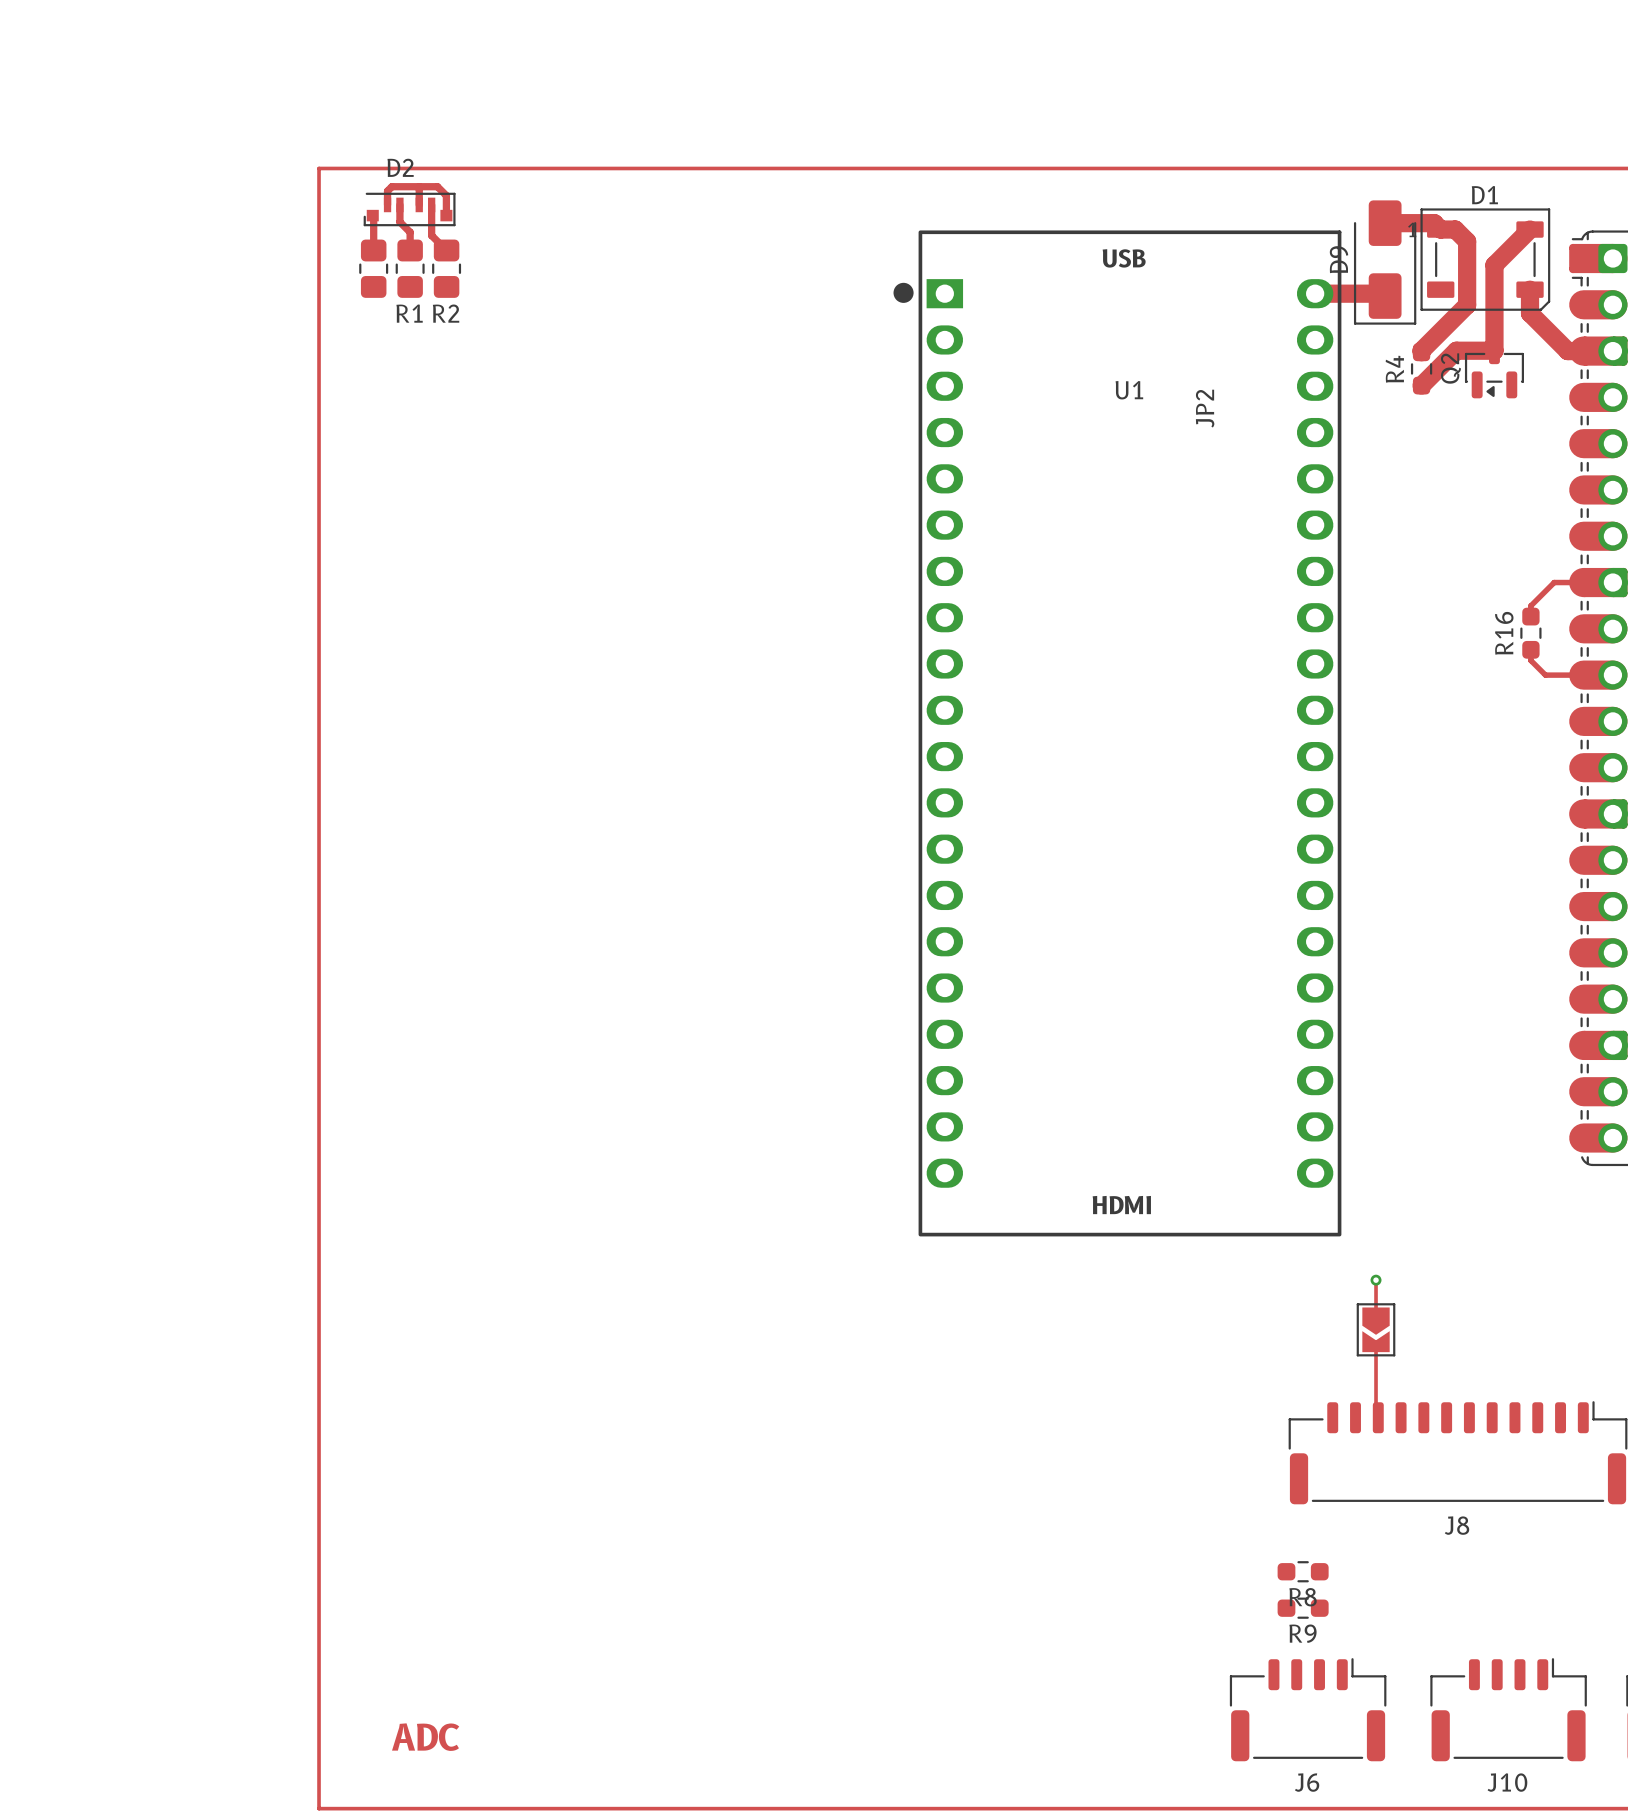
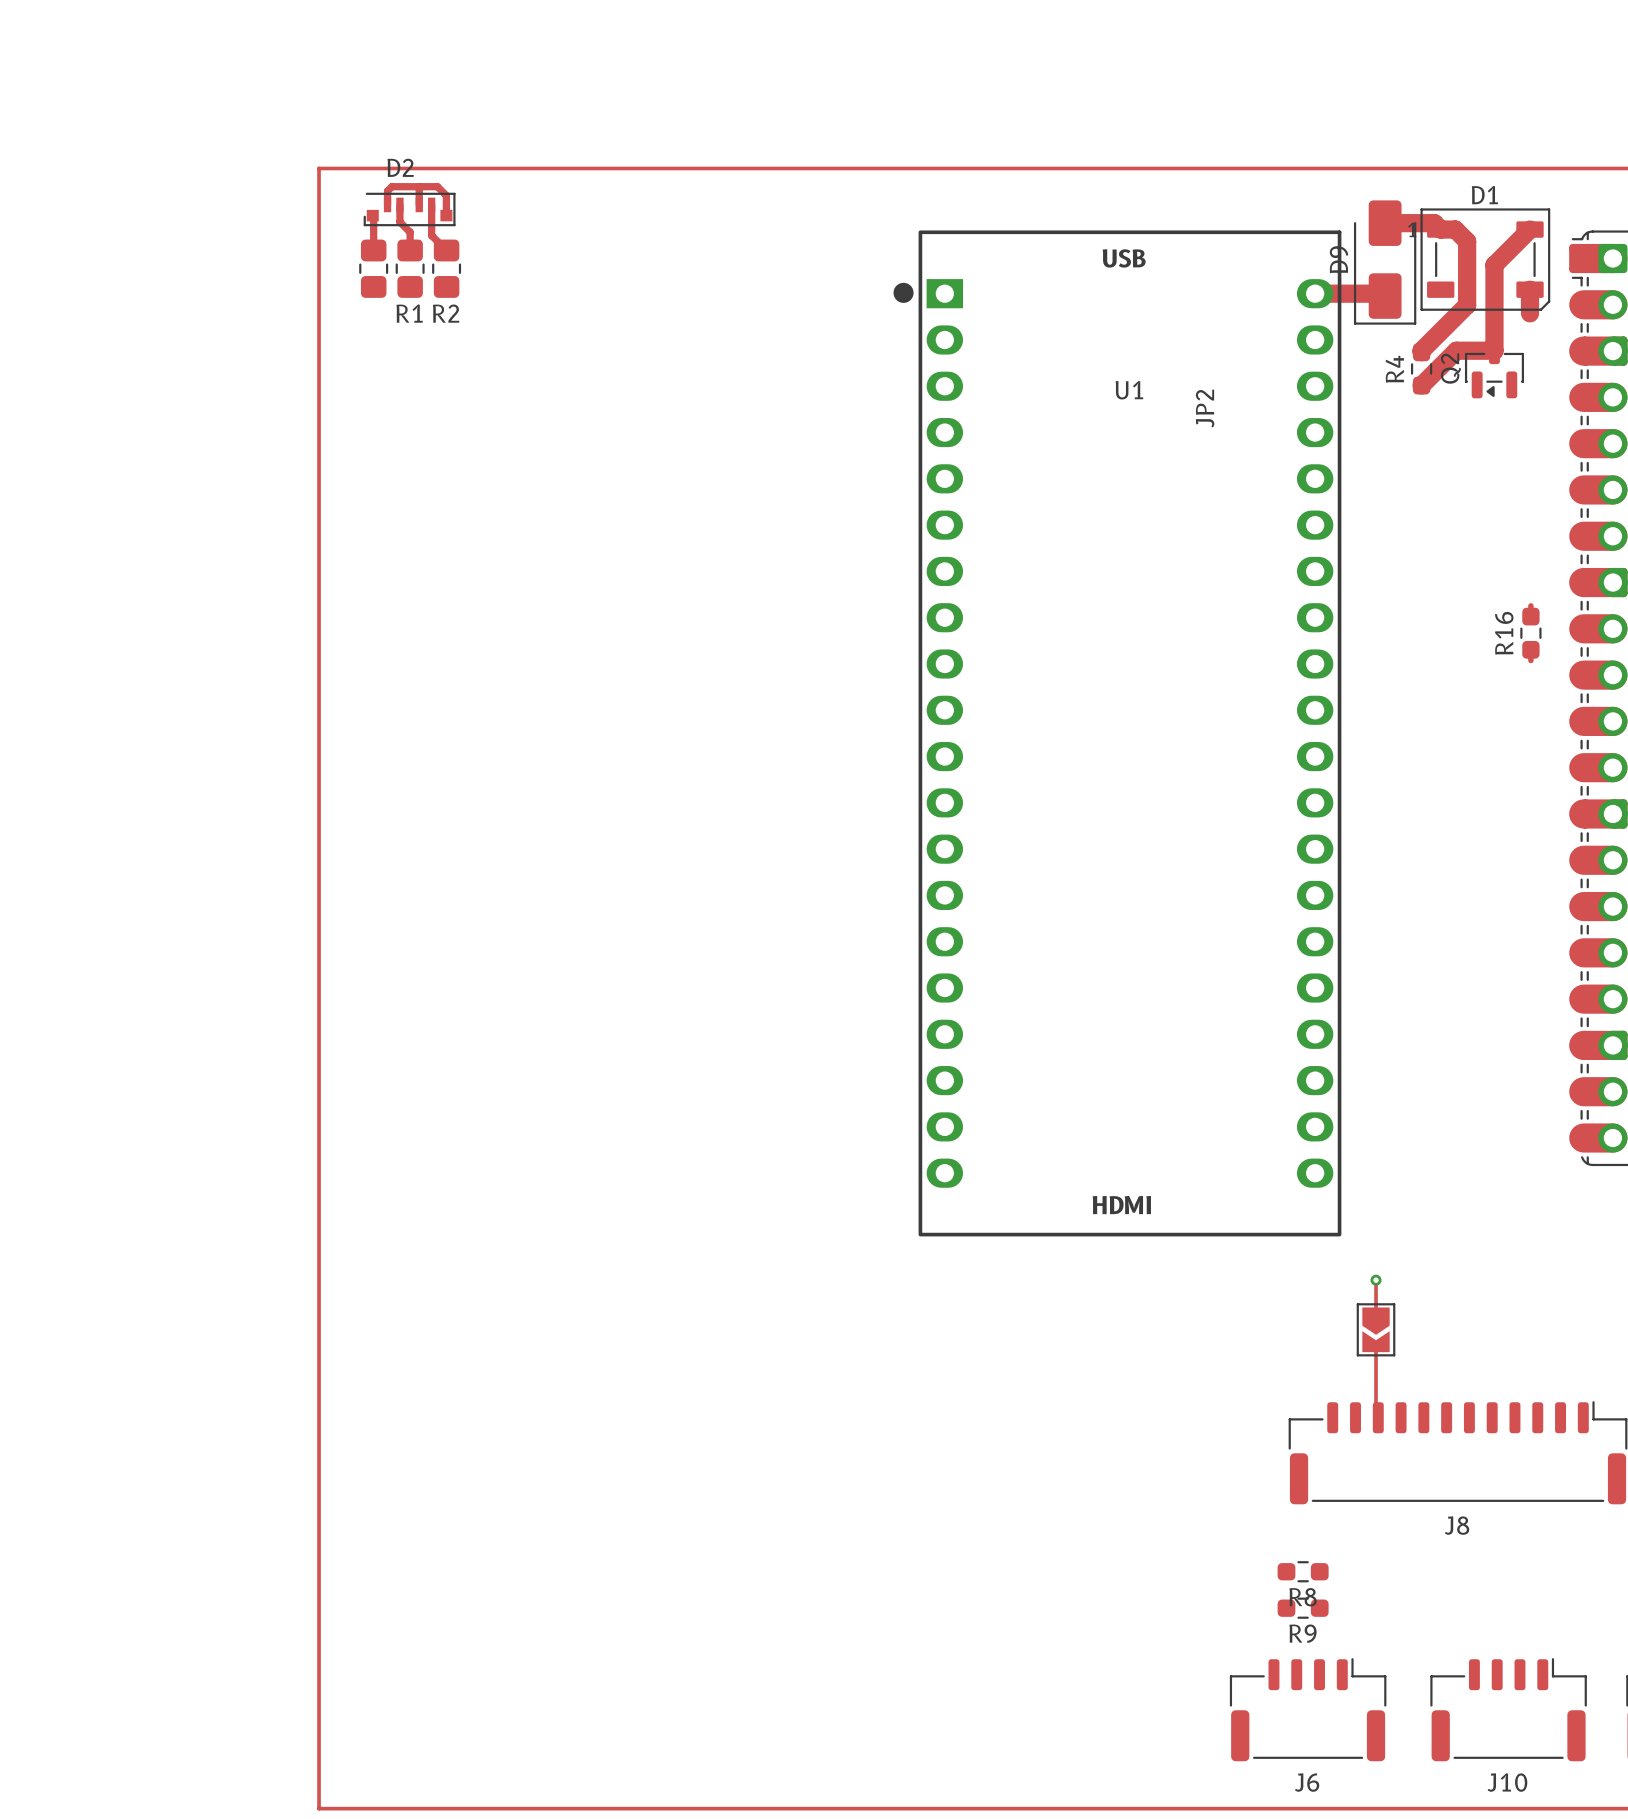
track: (1530, 313) (1567, 351) (1598, 351) -> none
track: (1598, 582) (1554, 582) (1530, 605) -> none
track: (1530, 660) (1545, 675) (1598, 675) -> none
text: ADC (425, 1737) -> none

